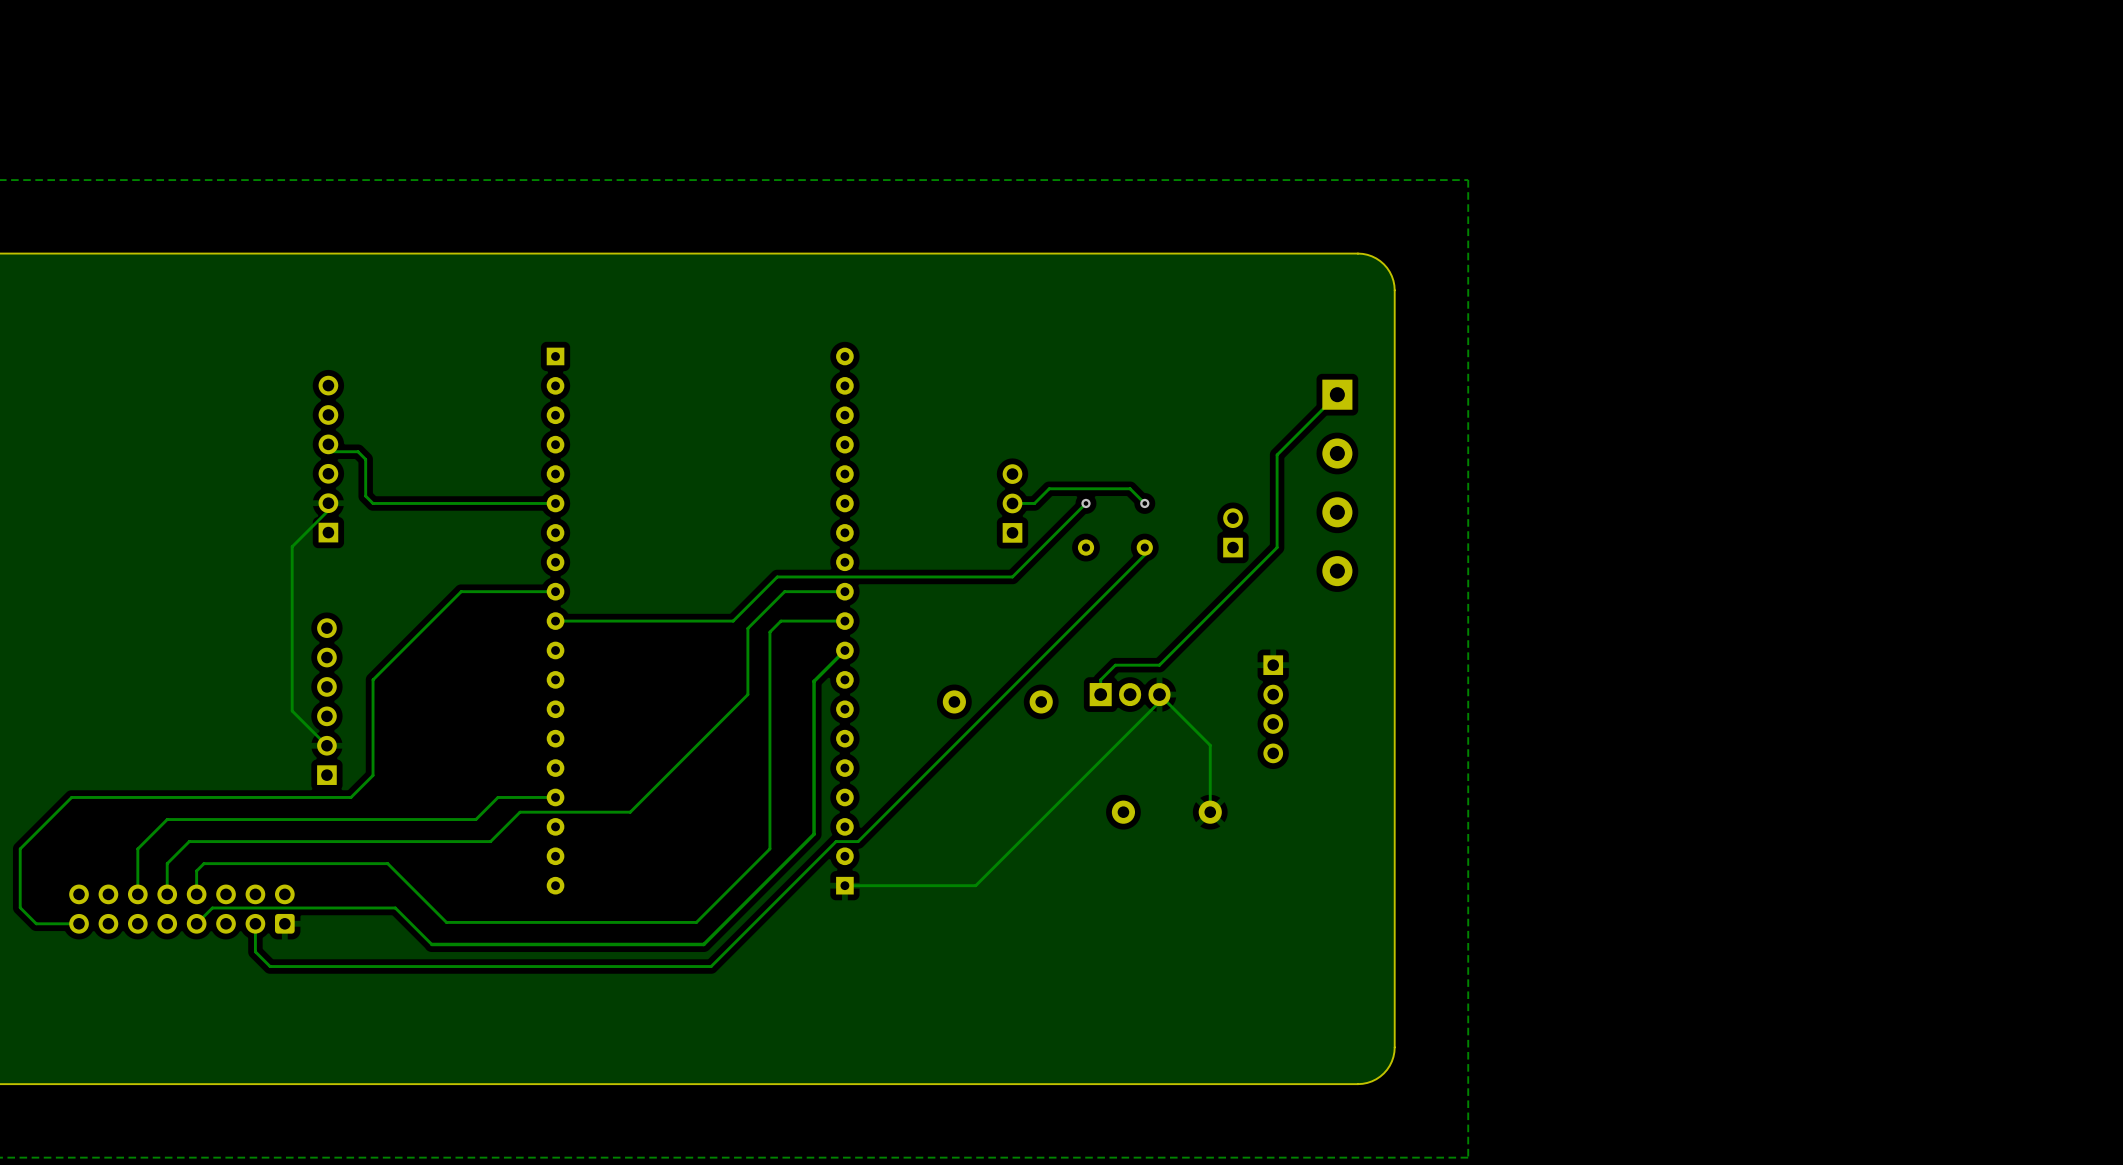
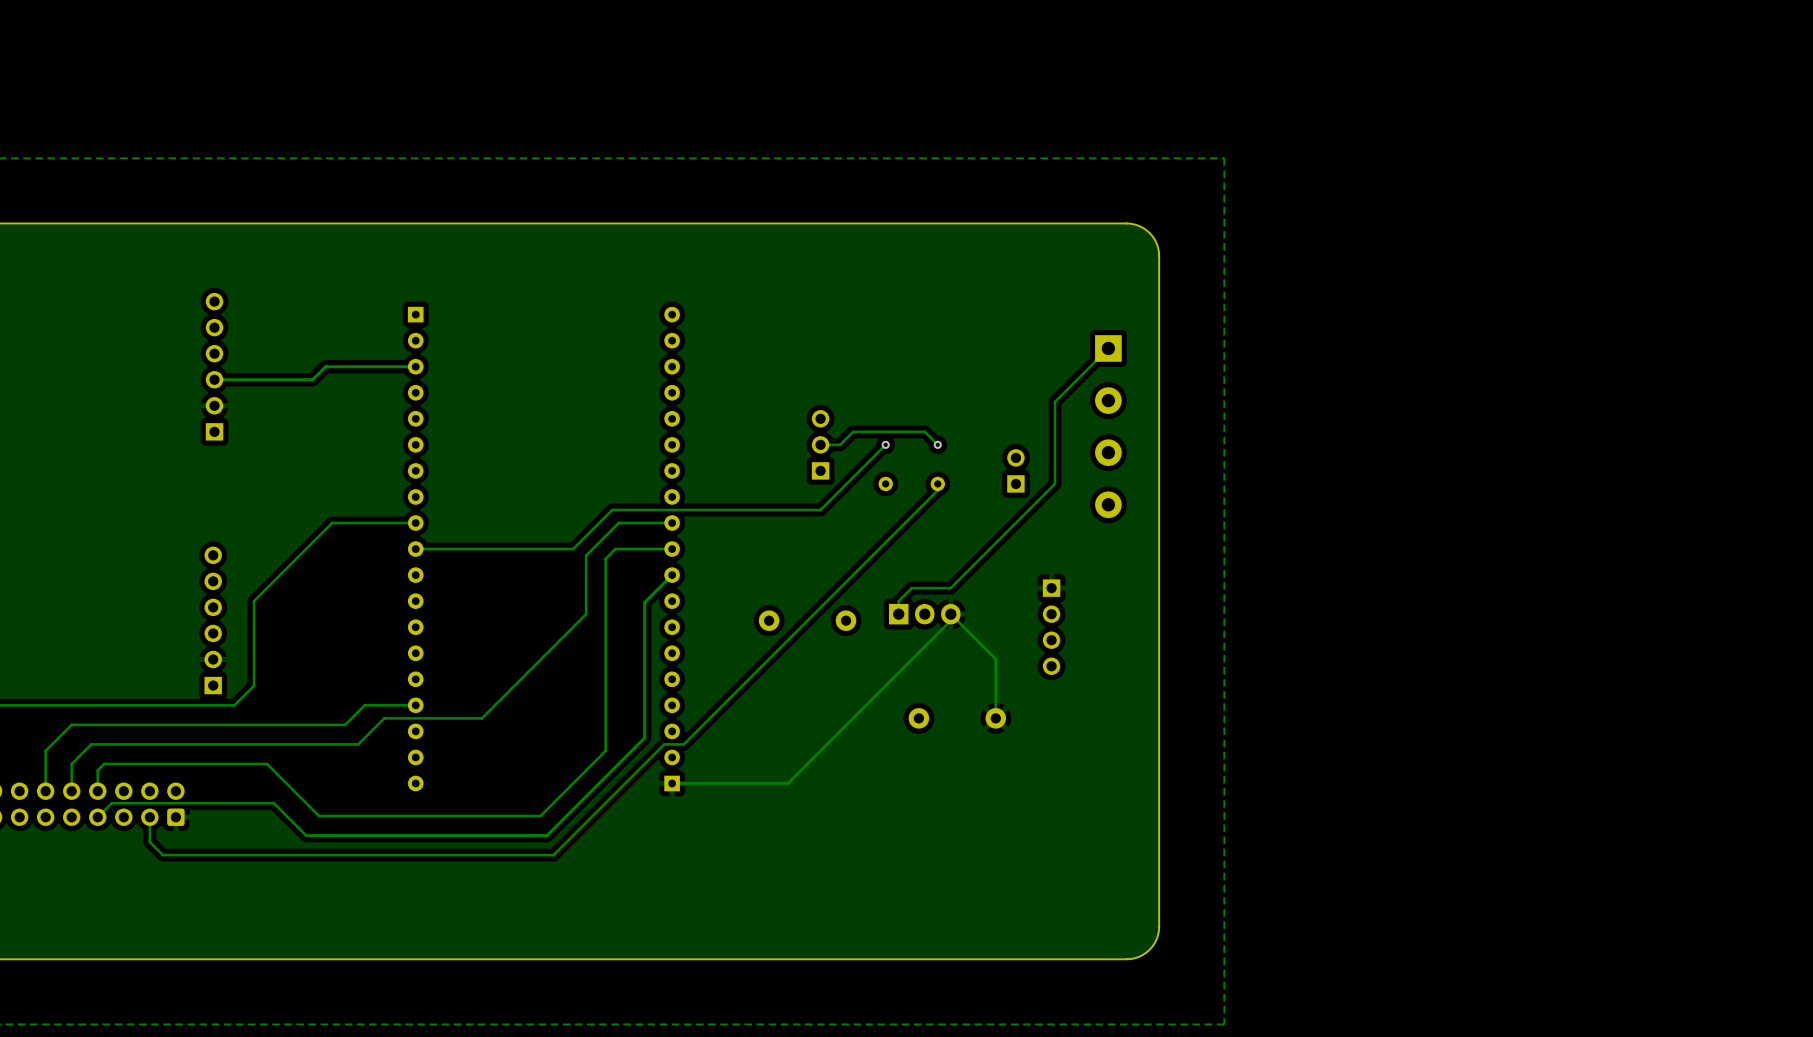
track: none -> (415, 366) (325, 366) (312, 379) (214, 379)
track: (328, 451) (358, 451) (365, 459) (365, 496) (373, 503) (555, 503) -> none
part position: (328, 459) -> (214, 366)
track: (328, 510) (292, 546) (292, 710) (326, 745) -> none

